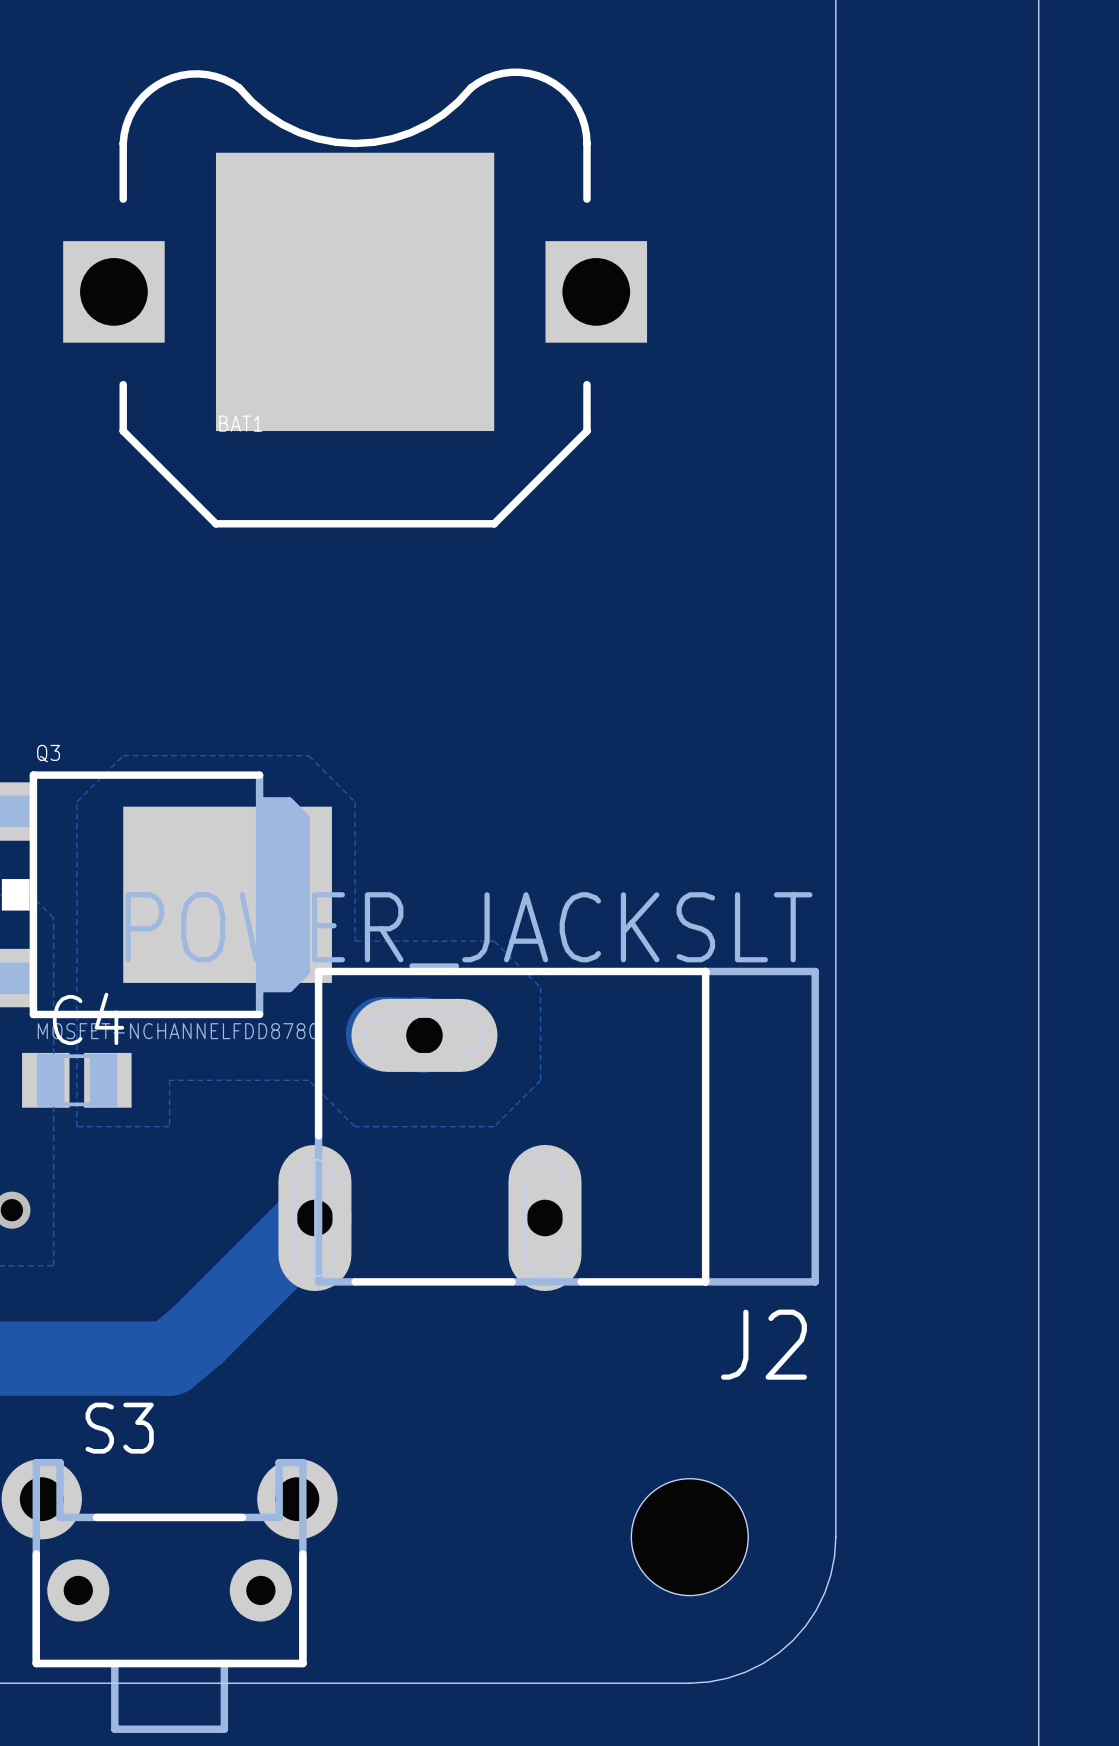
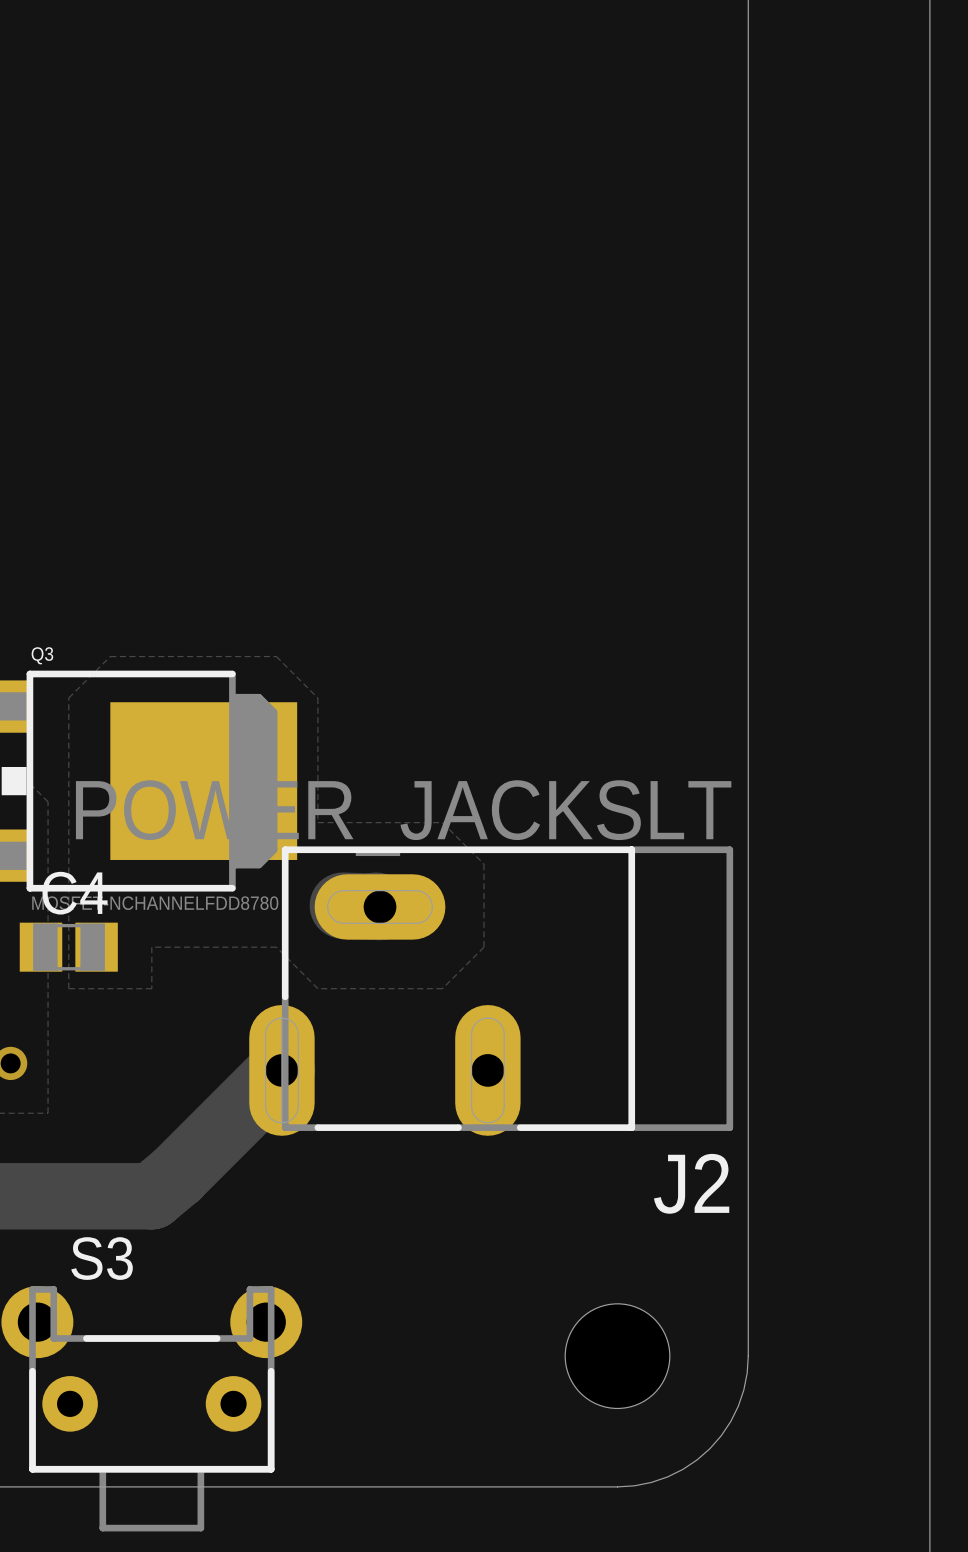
part: (355, 298) -> none

